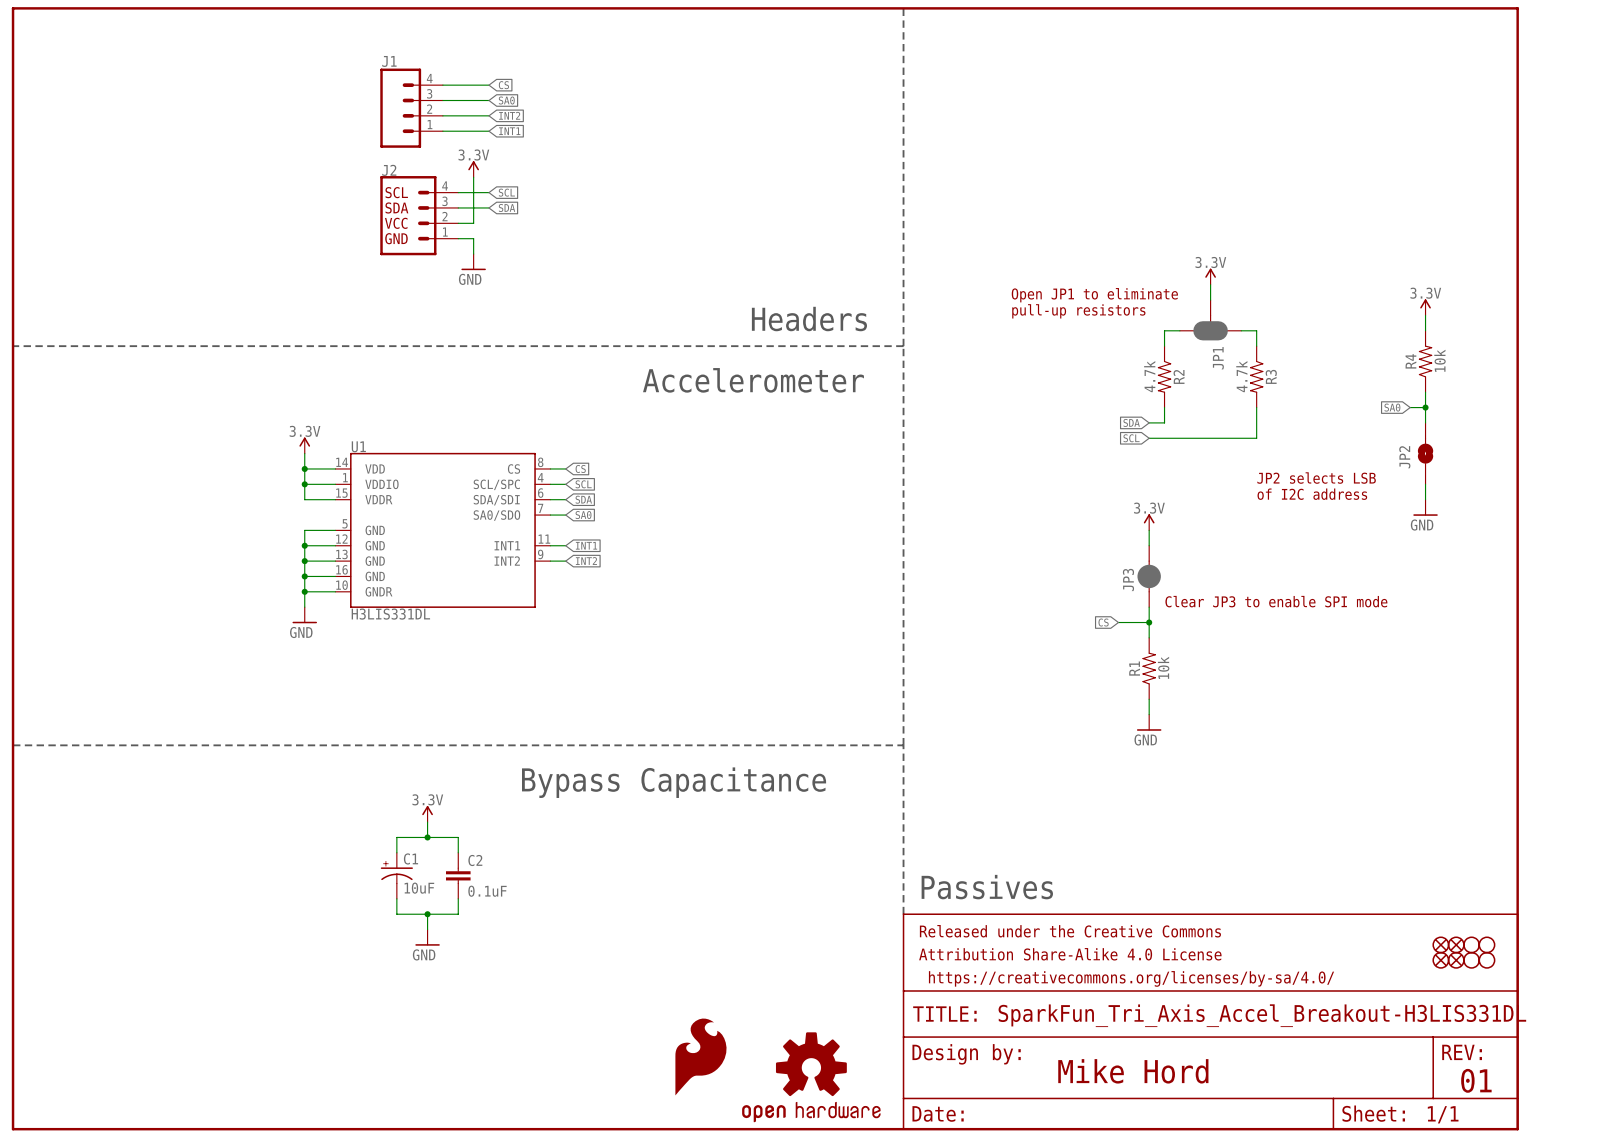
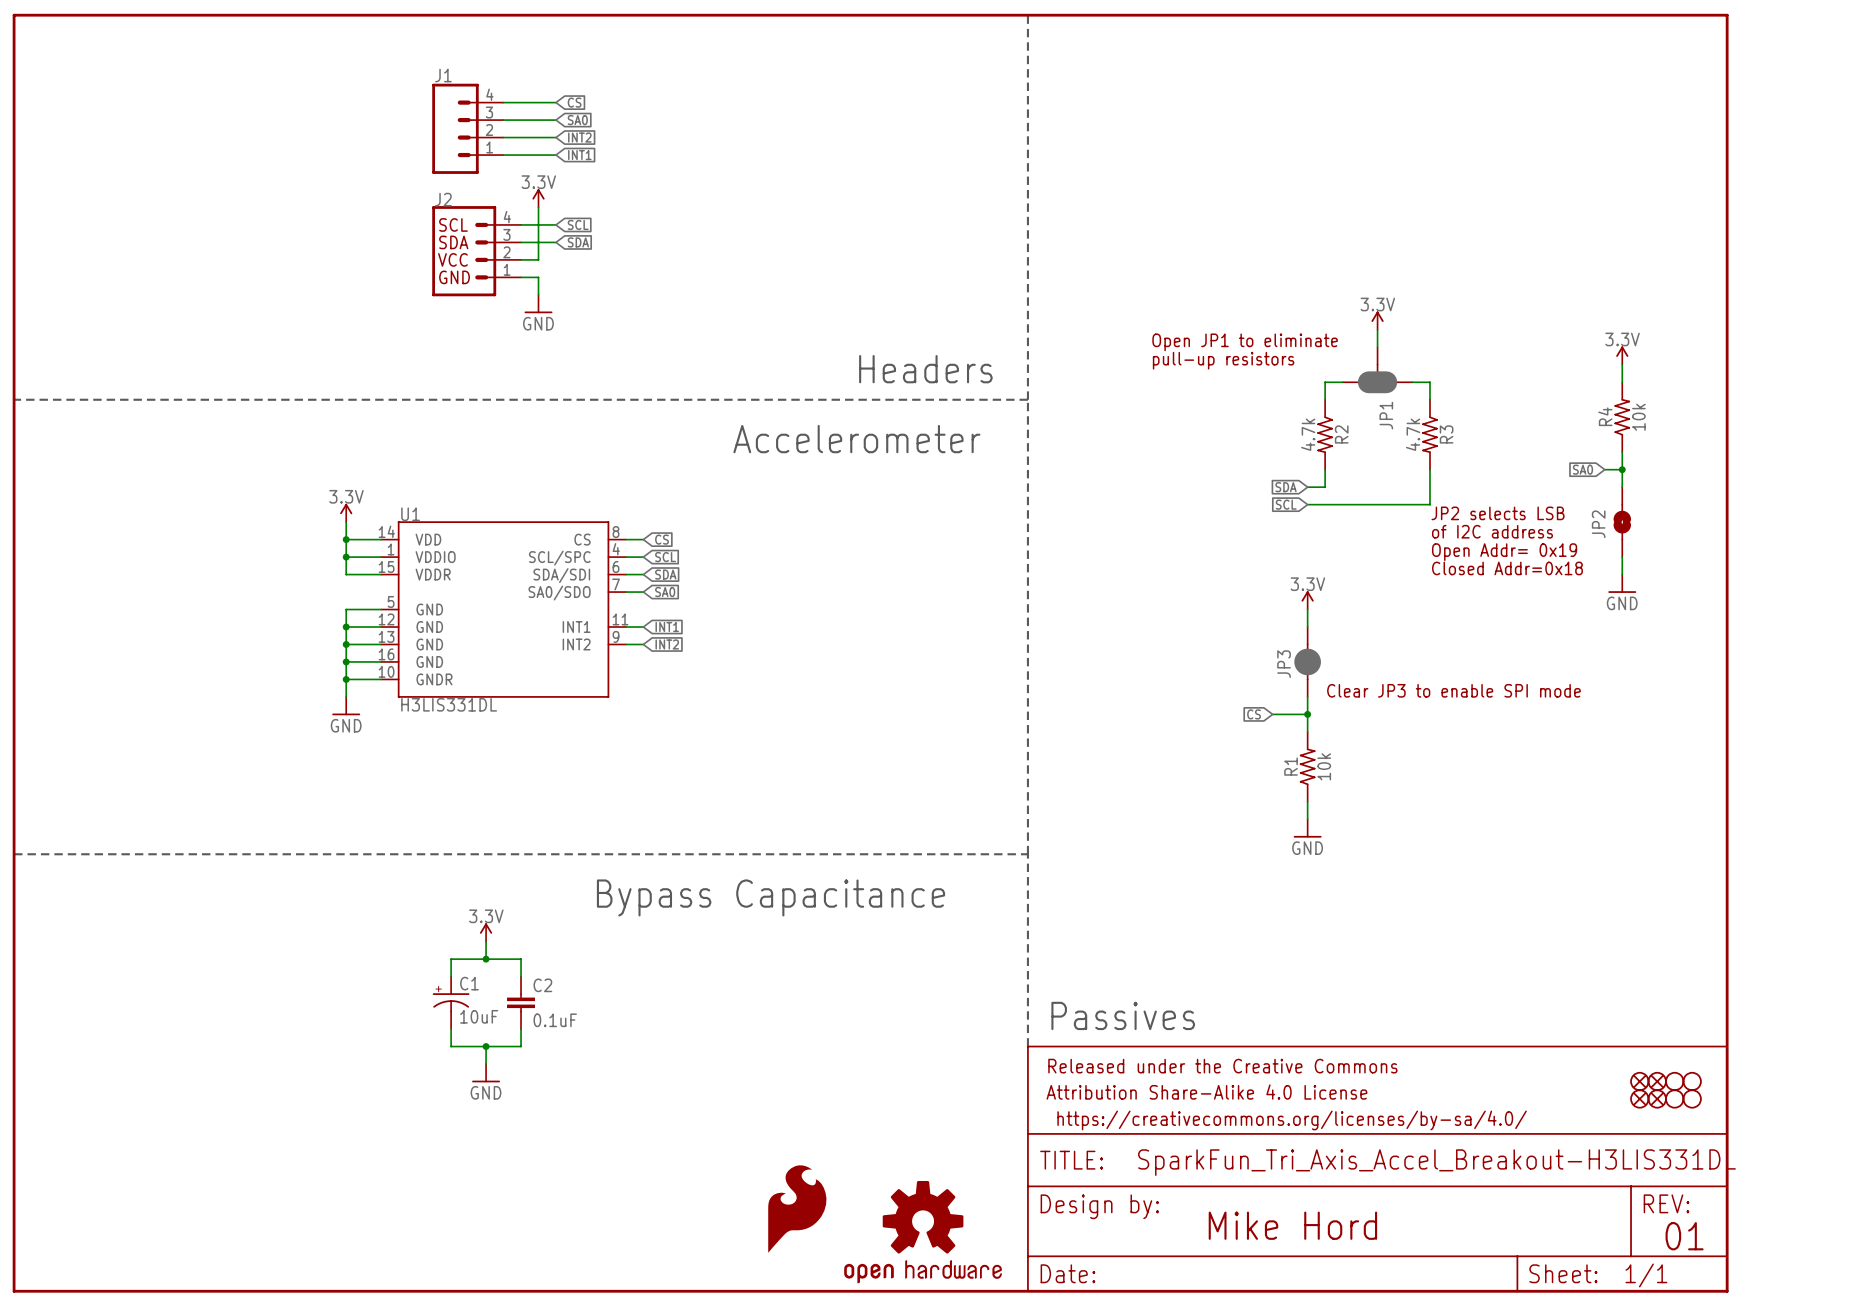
text: none -> JP2 selects LSB (1498, 513)
text: none -> of I2C address (1492, 531)
text: JP2 selects LSB (1316, 478) -> Open Addr= 0x19 (1504, 552)
text: of I2C address (1312, 494) -> Closed Addr=0x18 (1507, 568)

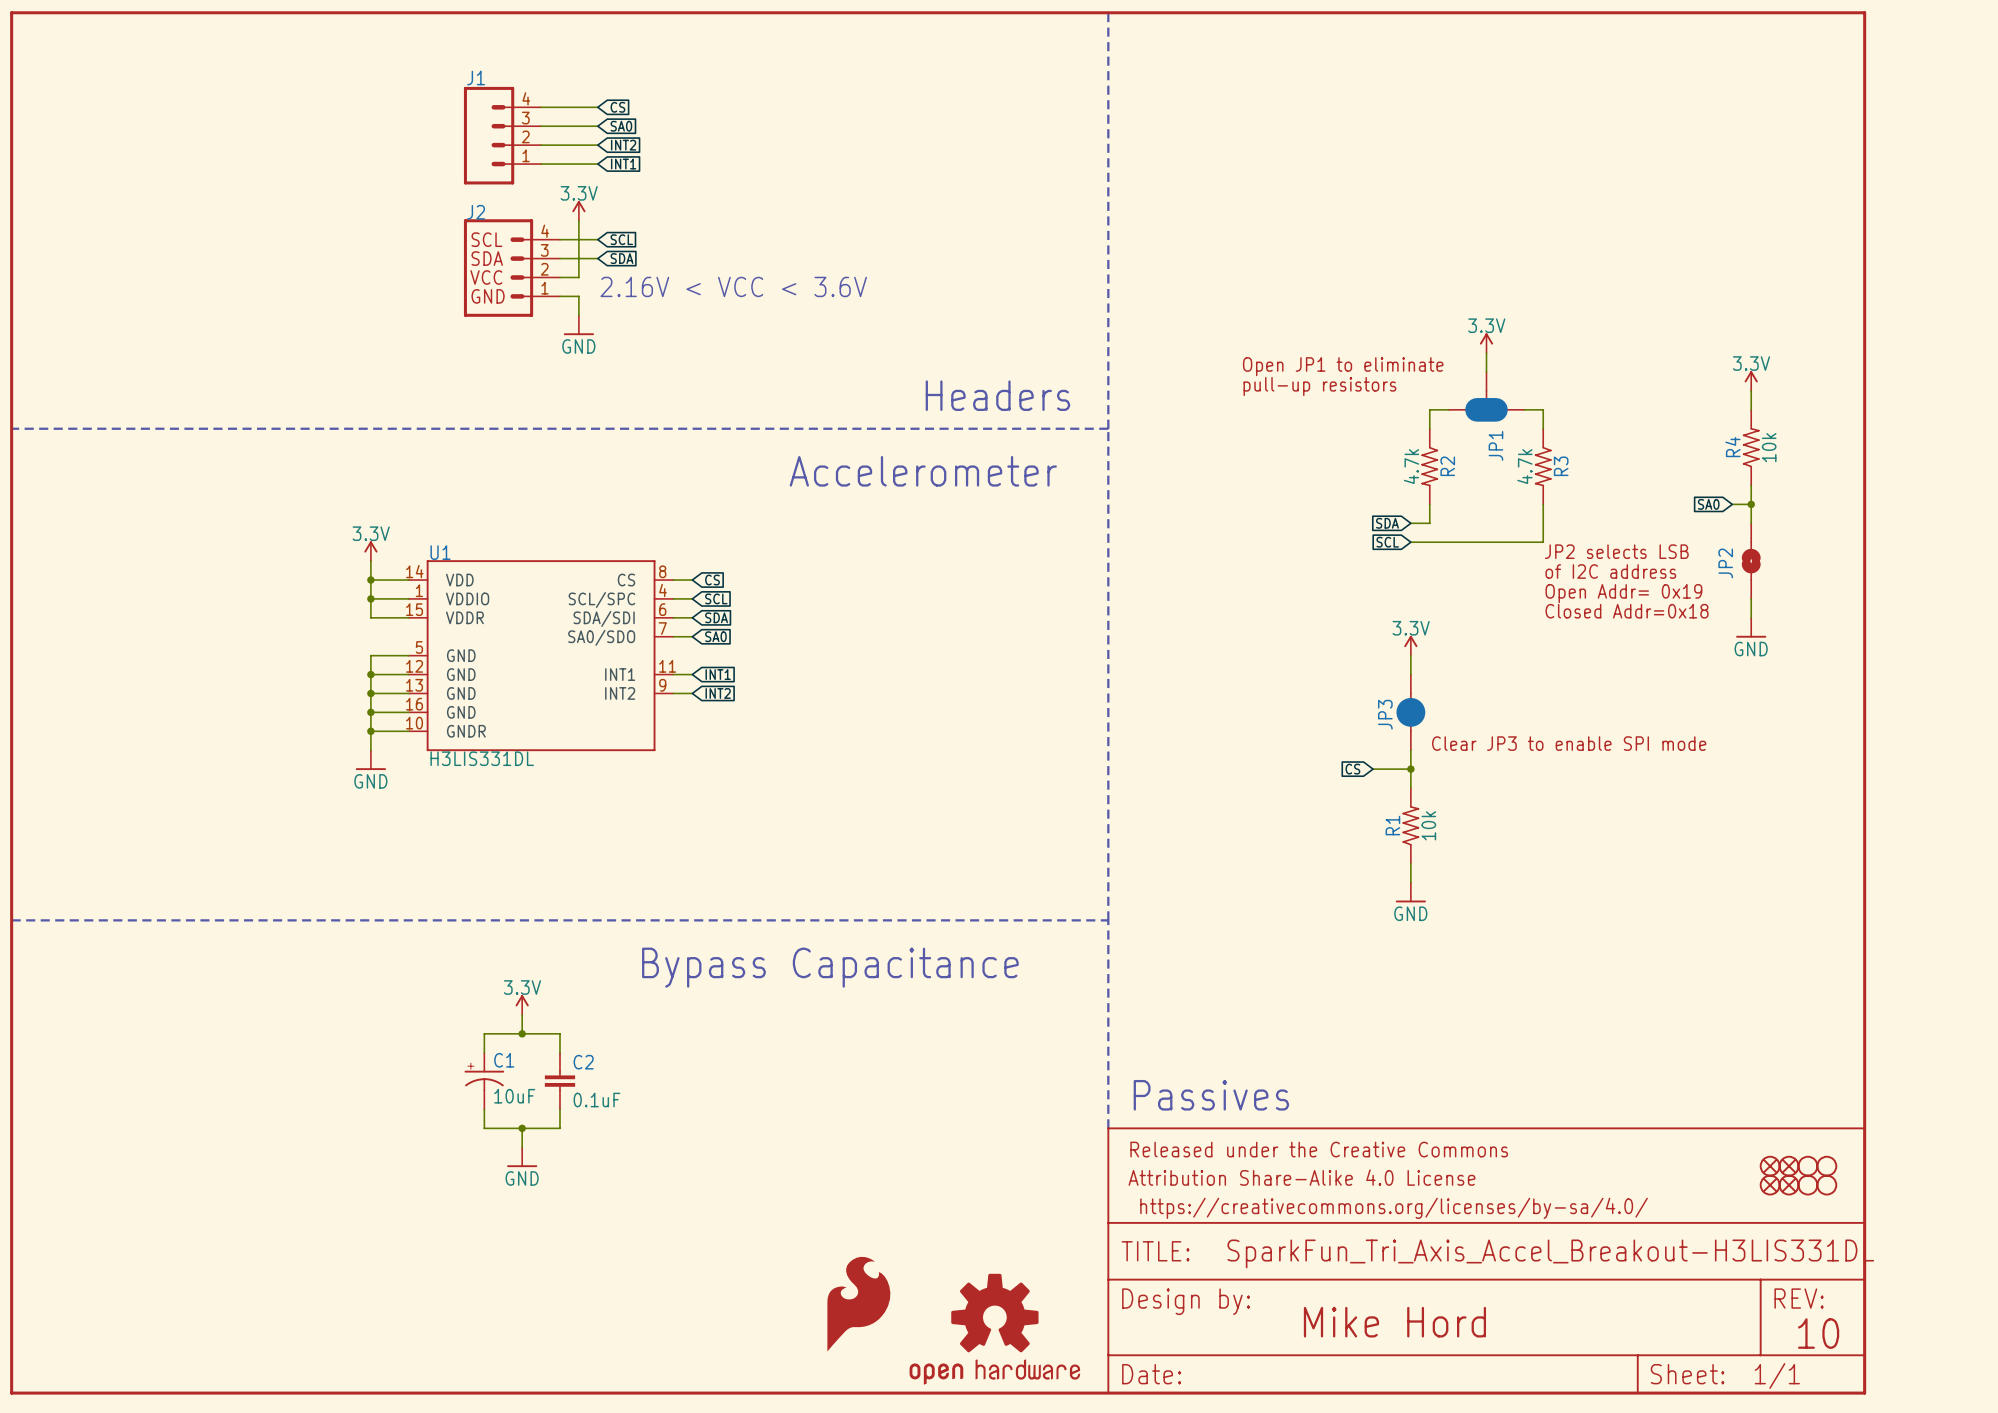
text: none -> 2.16V < VCC < 3.6V (733, 286)
text: 01 (1684, 1236) -> 10 (1818, 1333)

